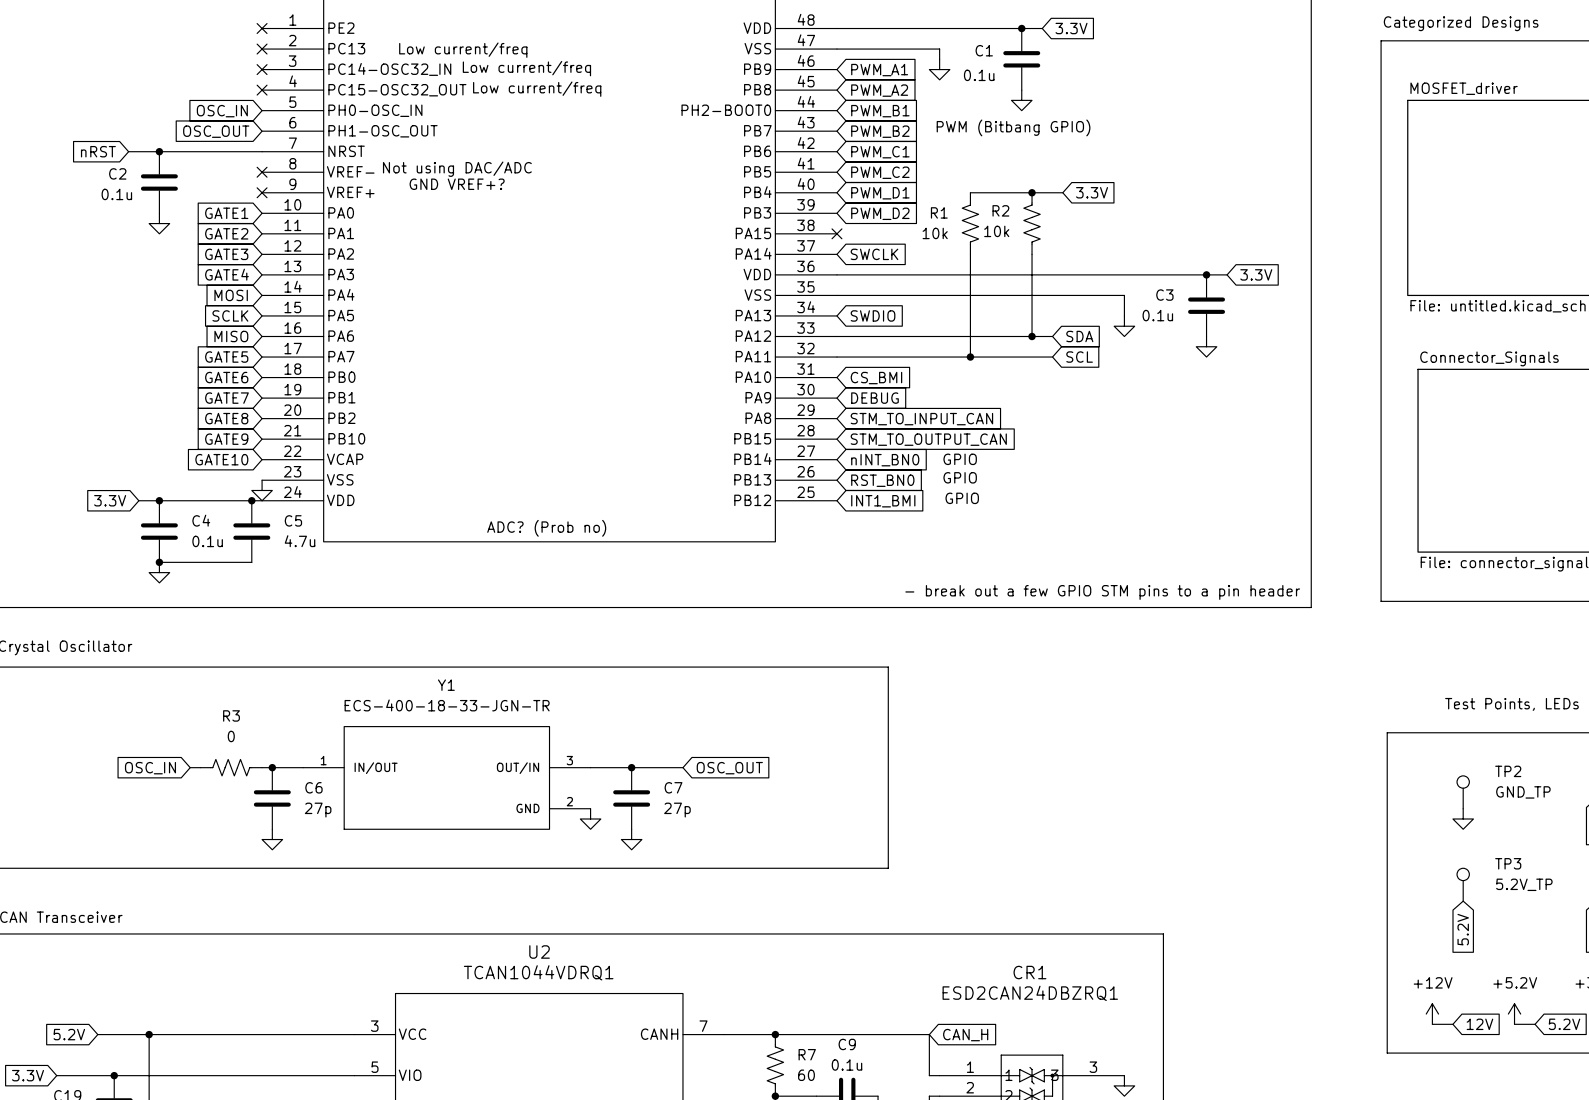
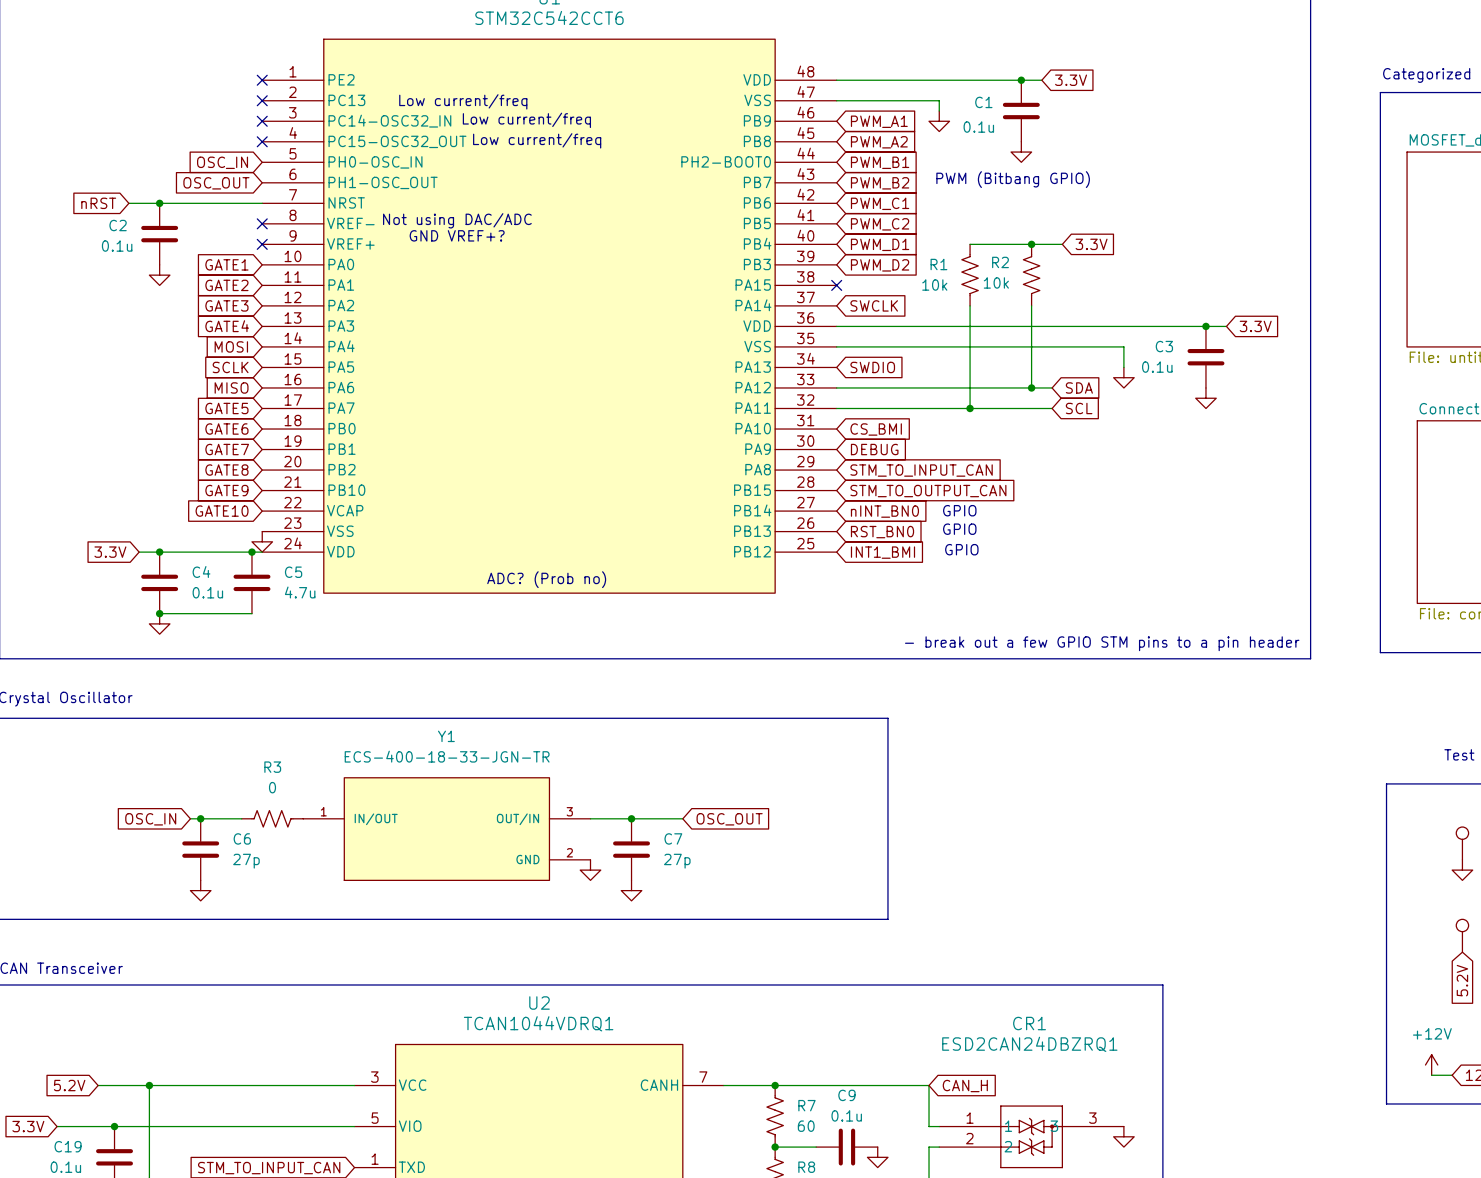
junction: none -> (200, 818)
R3 position: (231, 767) -> (272, 818)
wire: (262, 767) (303, 767) -> (200, 818) (241, 818)
junction: (272, 767) -> none
C6 position: (272, 798) -> (200, 849)
power symbol position: (272, 839) -> (200, 890)

